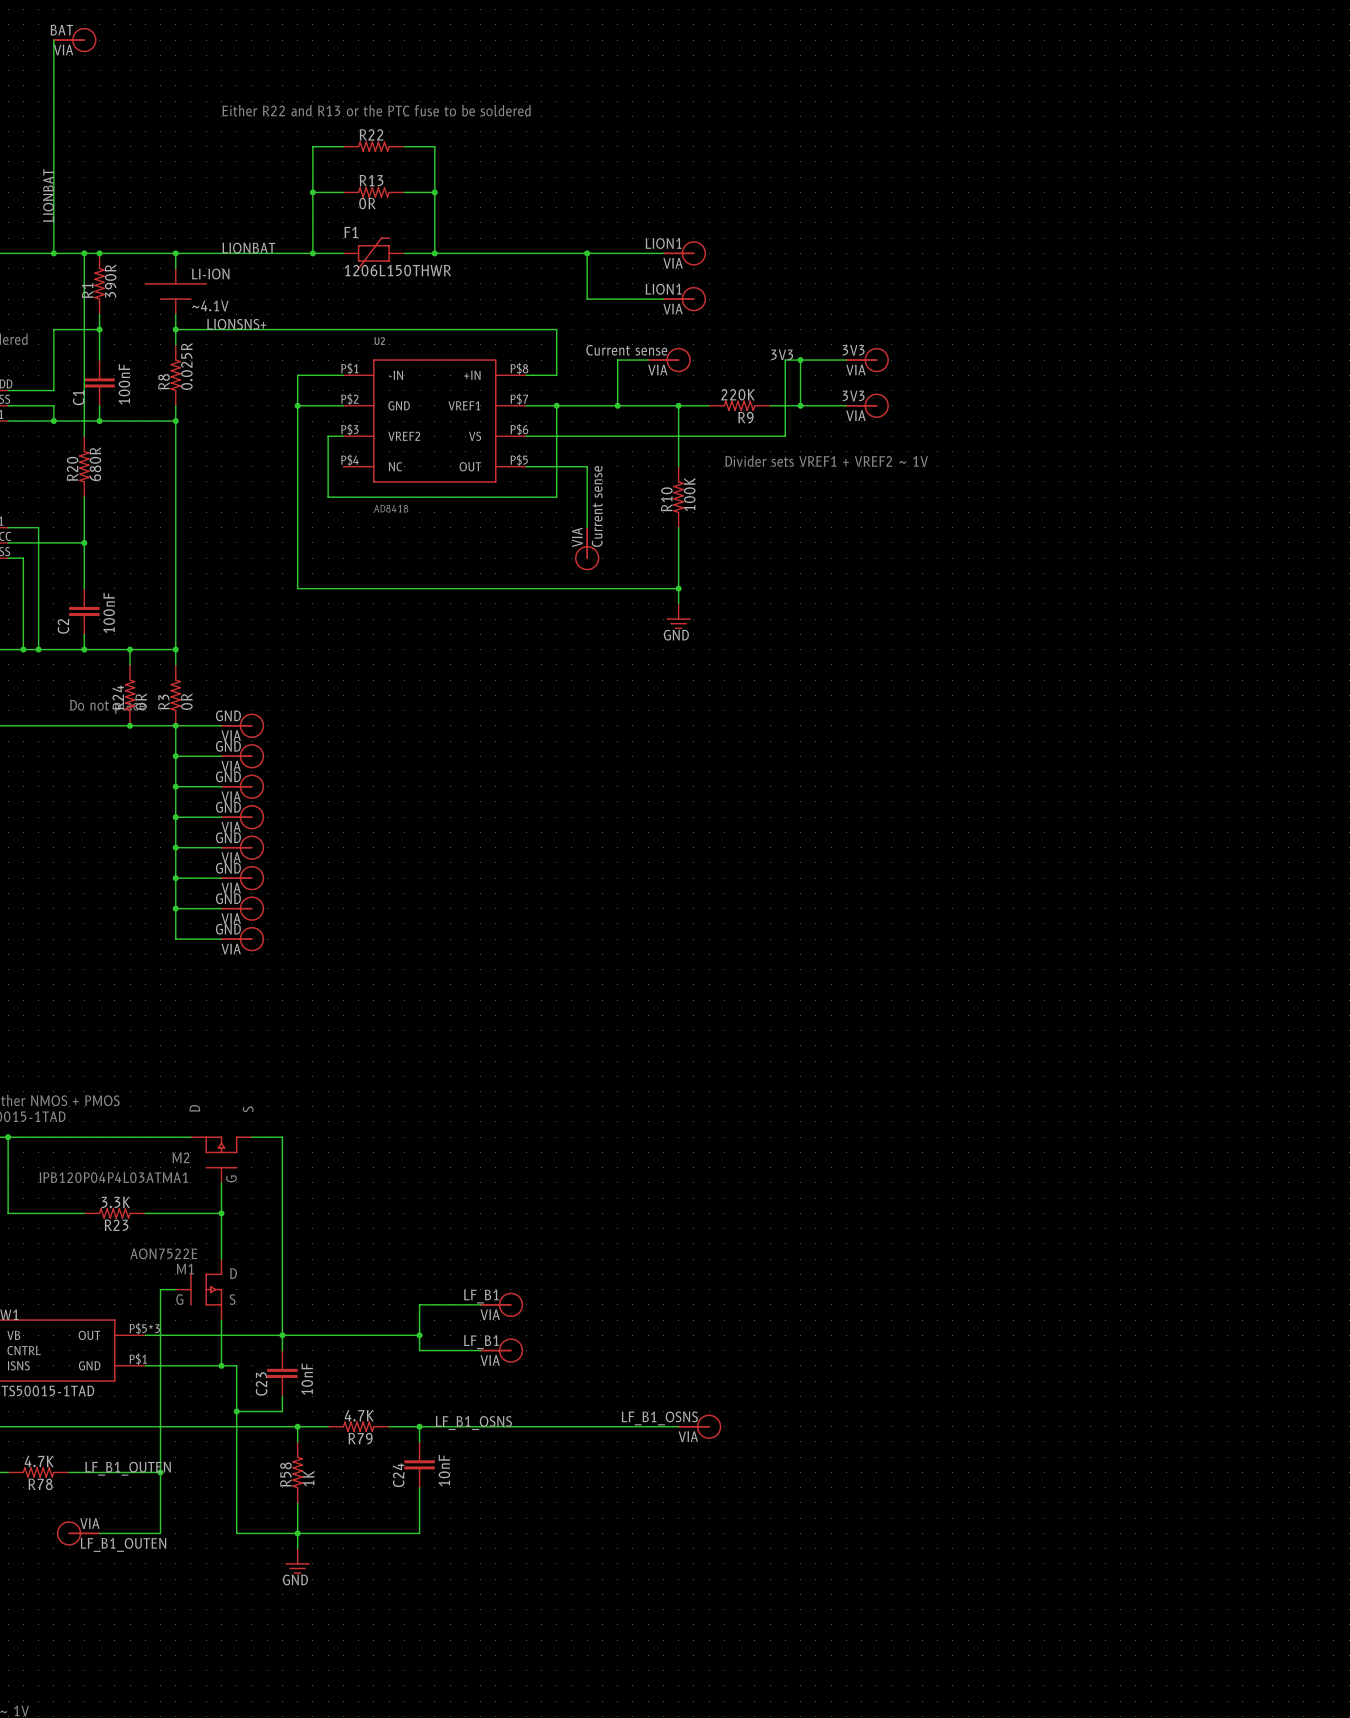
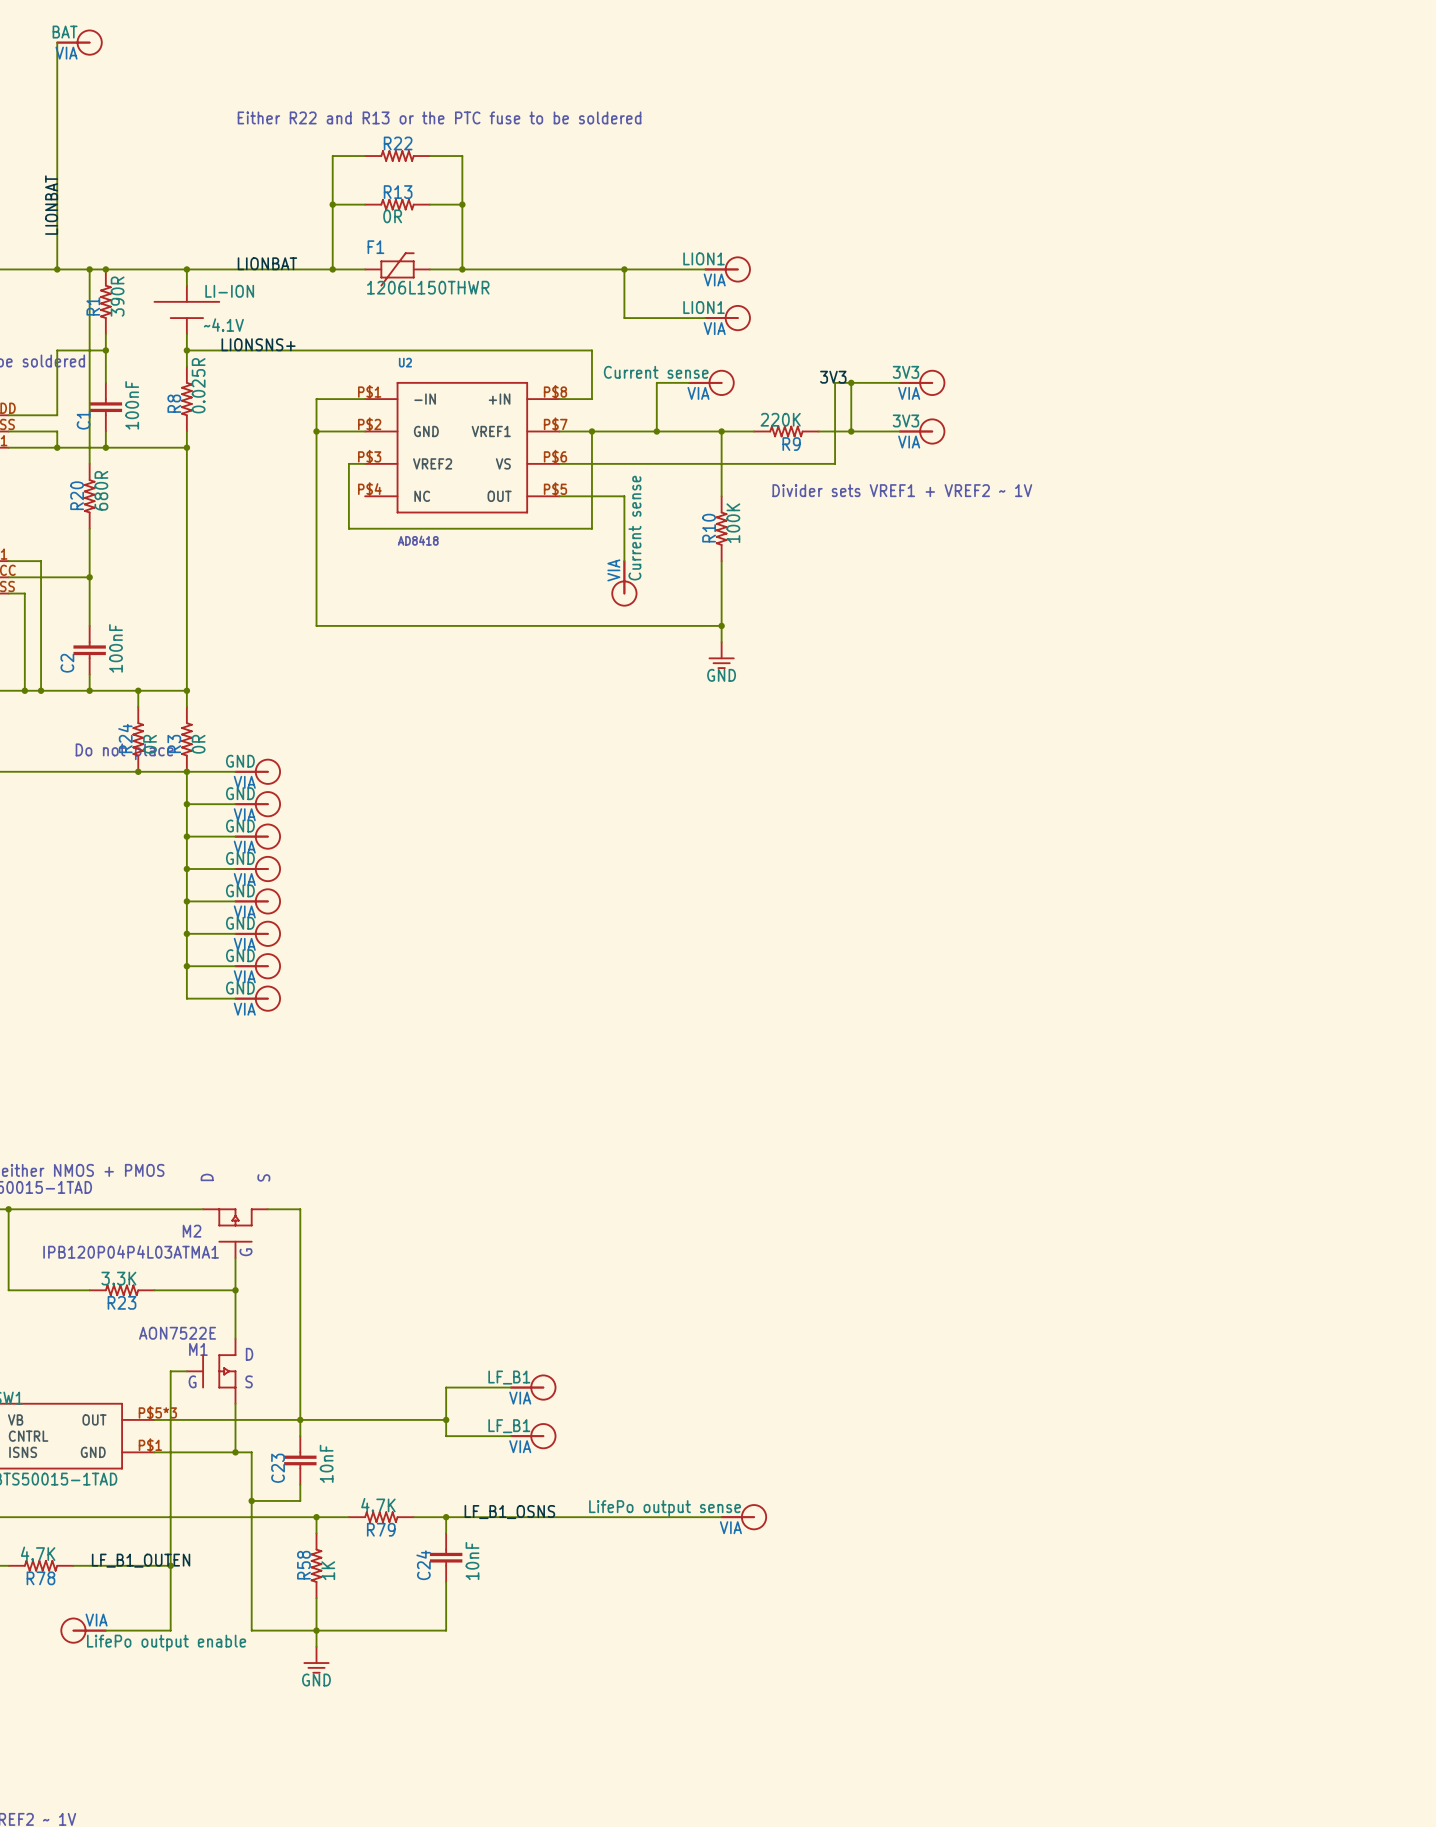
part value: LF_B1_OSNS (659, 1418) -> LifePo output sense (665, 1508)
part value: LF_B1_OUTEN (123, 1544) -> LifePo output enable (166, 1643)

